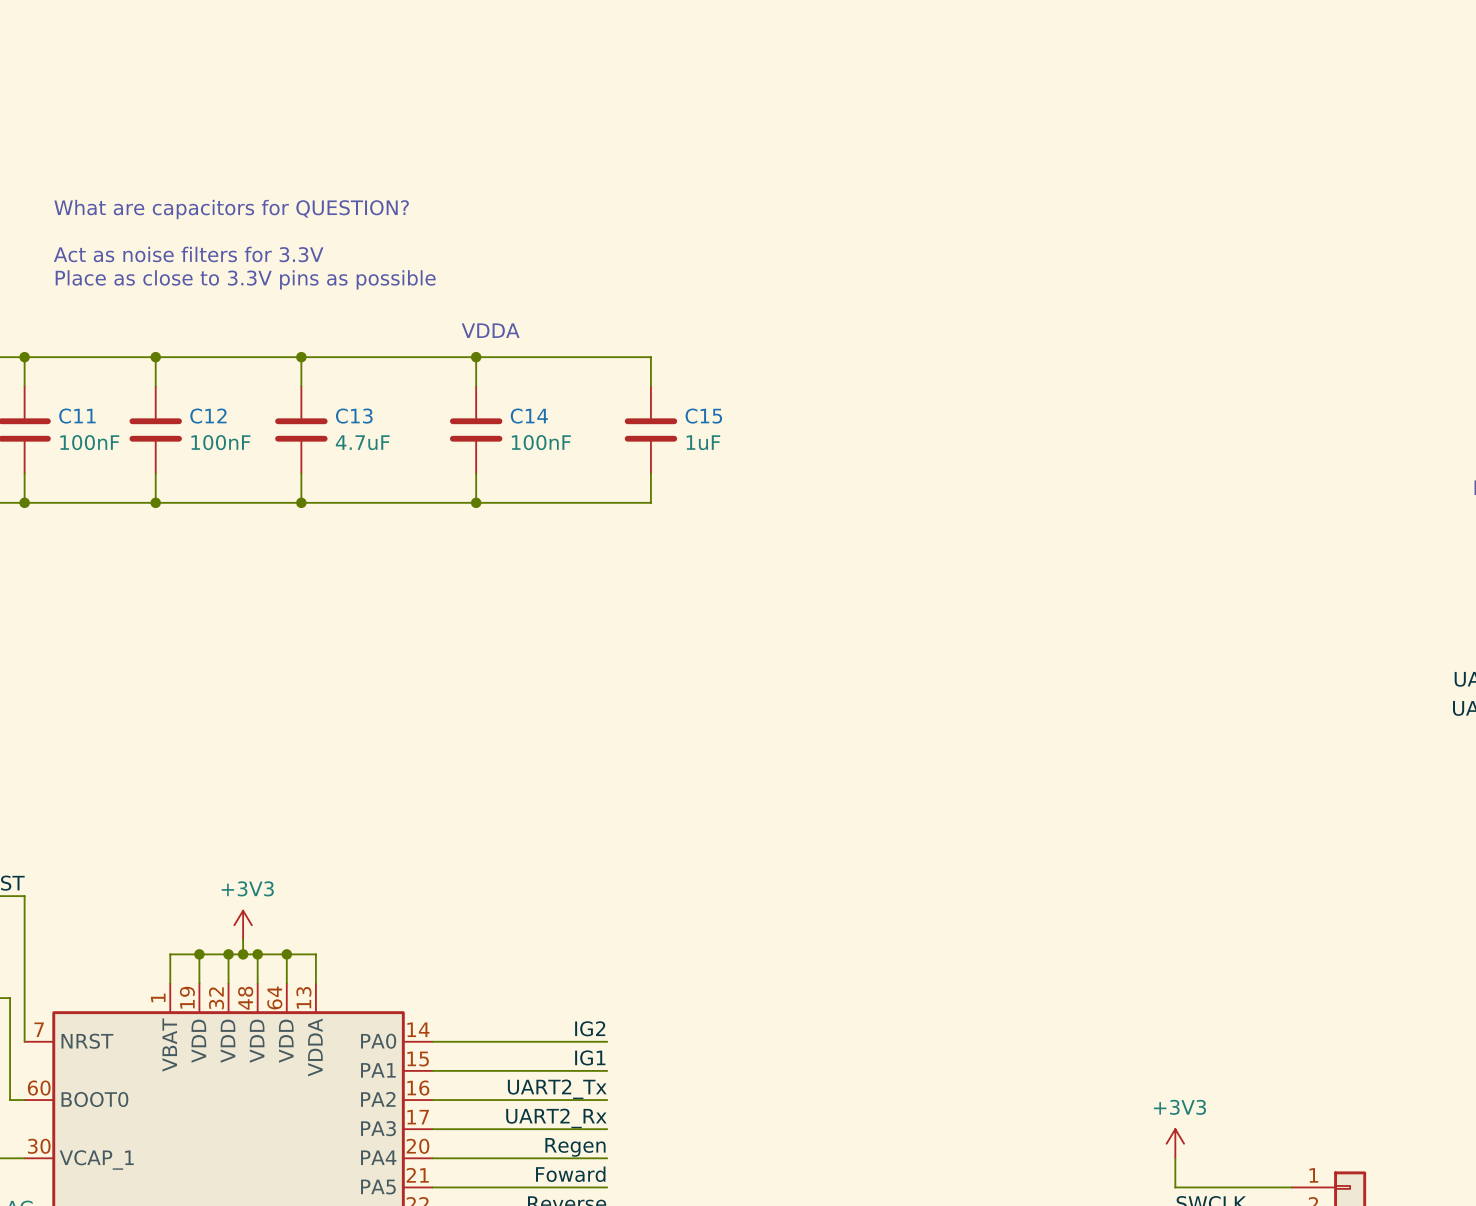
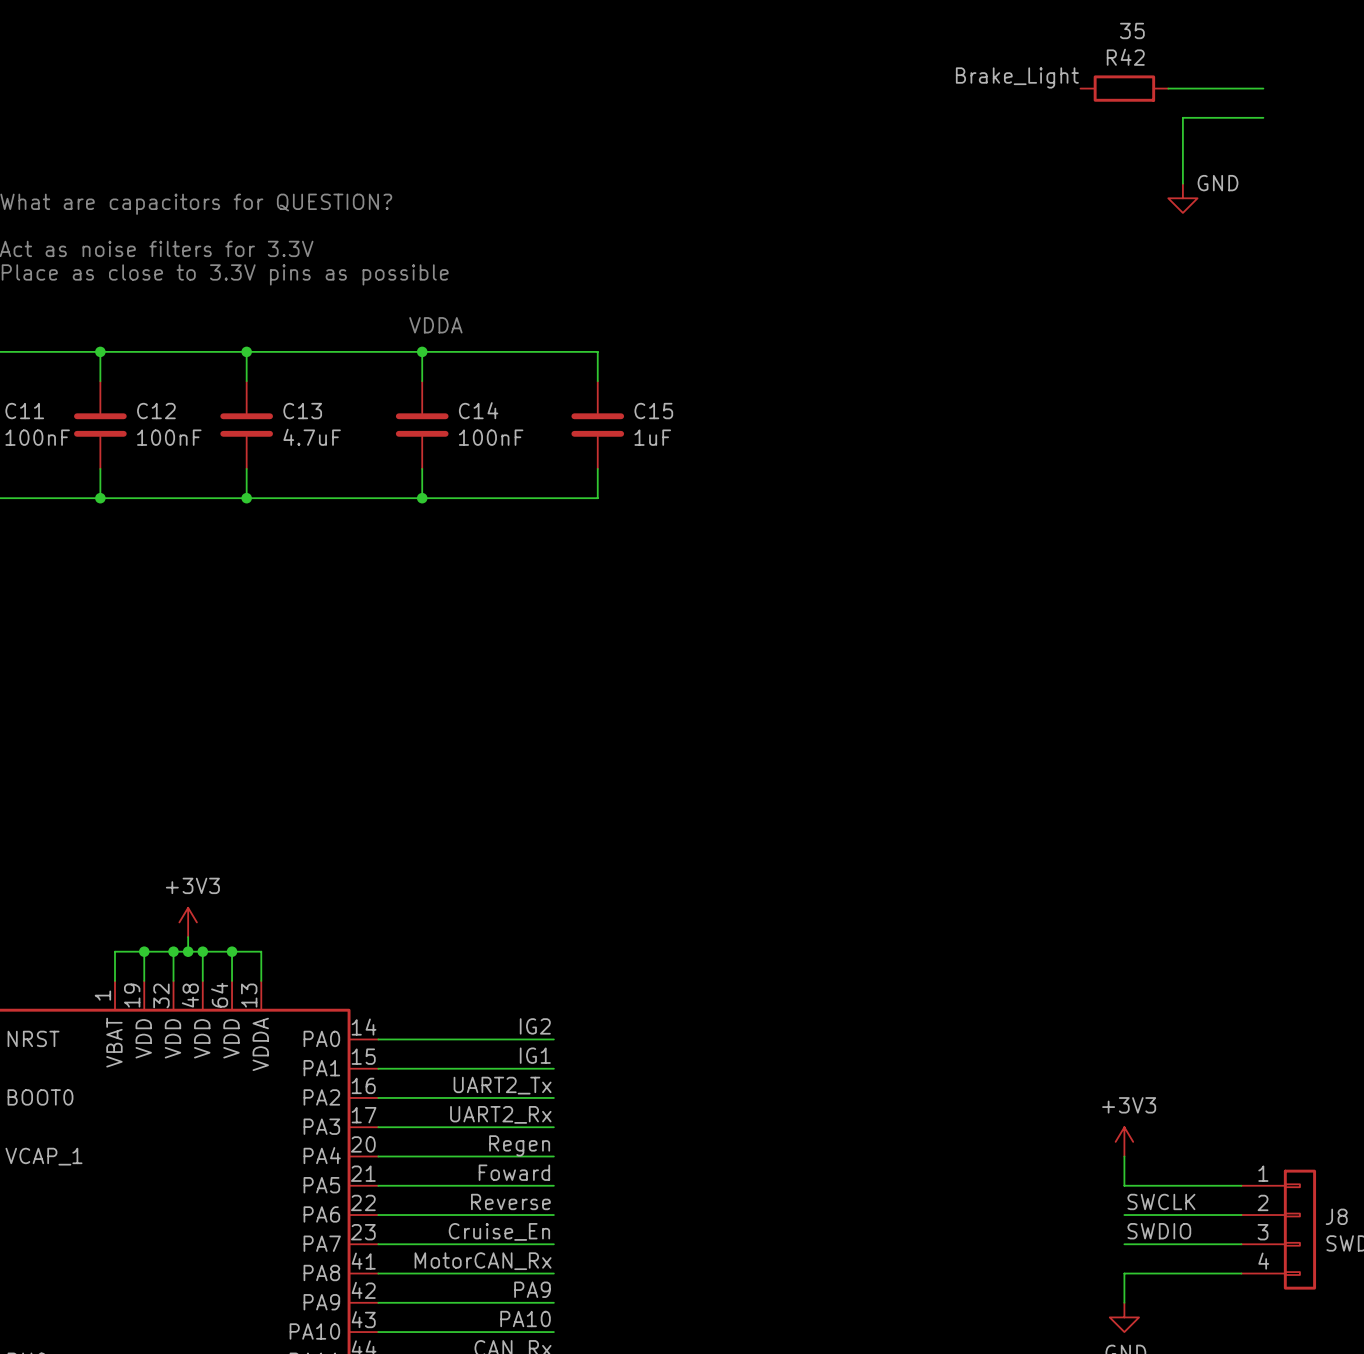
label: none -> Brake_Light (1017, 77)
R42: none -> 35 (1124, 88)
wire: none -> (1168, 88) (1263, 88)
wire: none -> (1263, 117) (1182, 117) (1182, 183)
power symbol: none -> GND (1182, 198)

